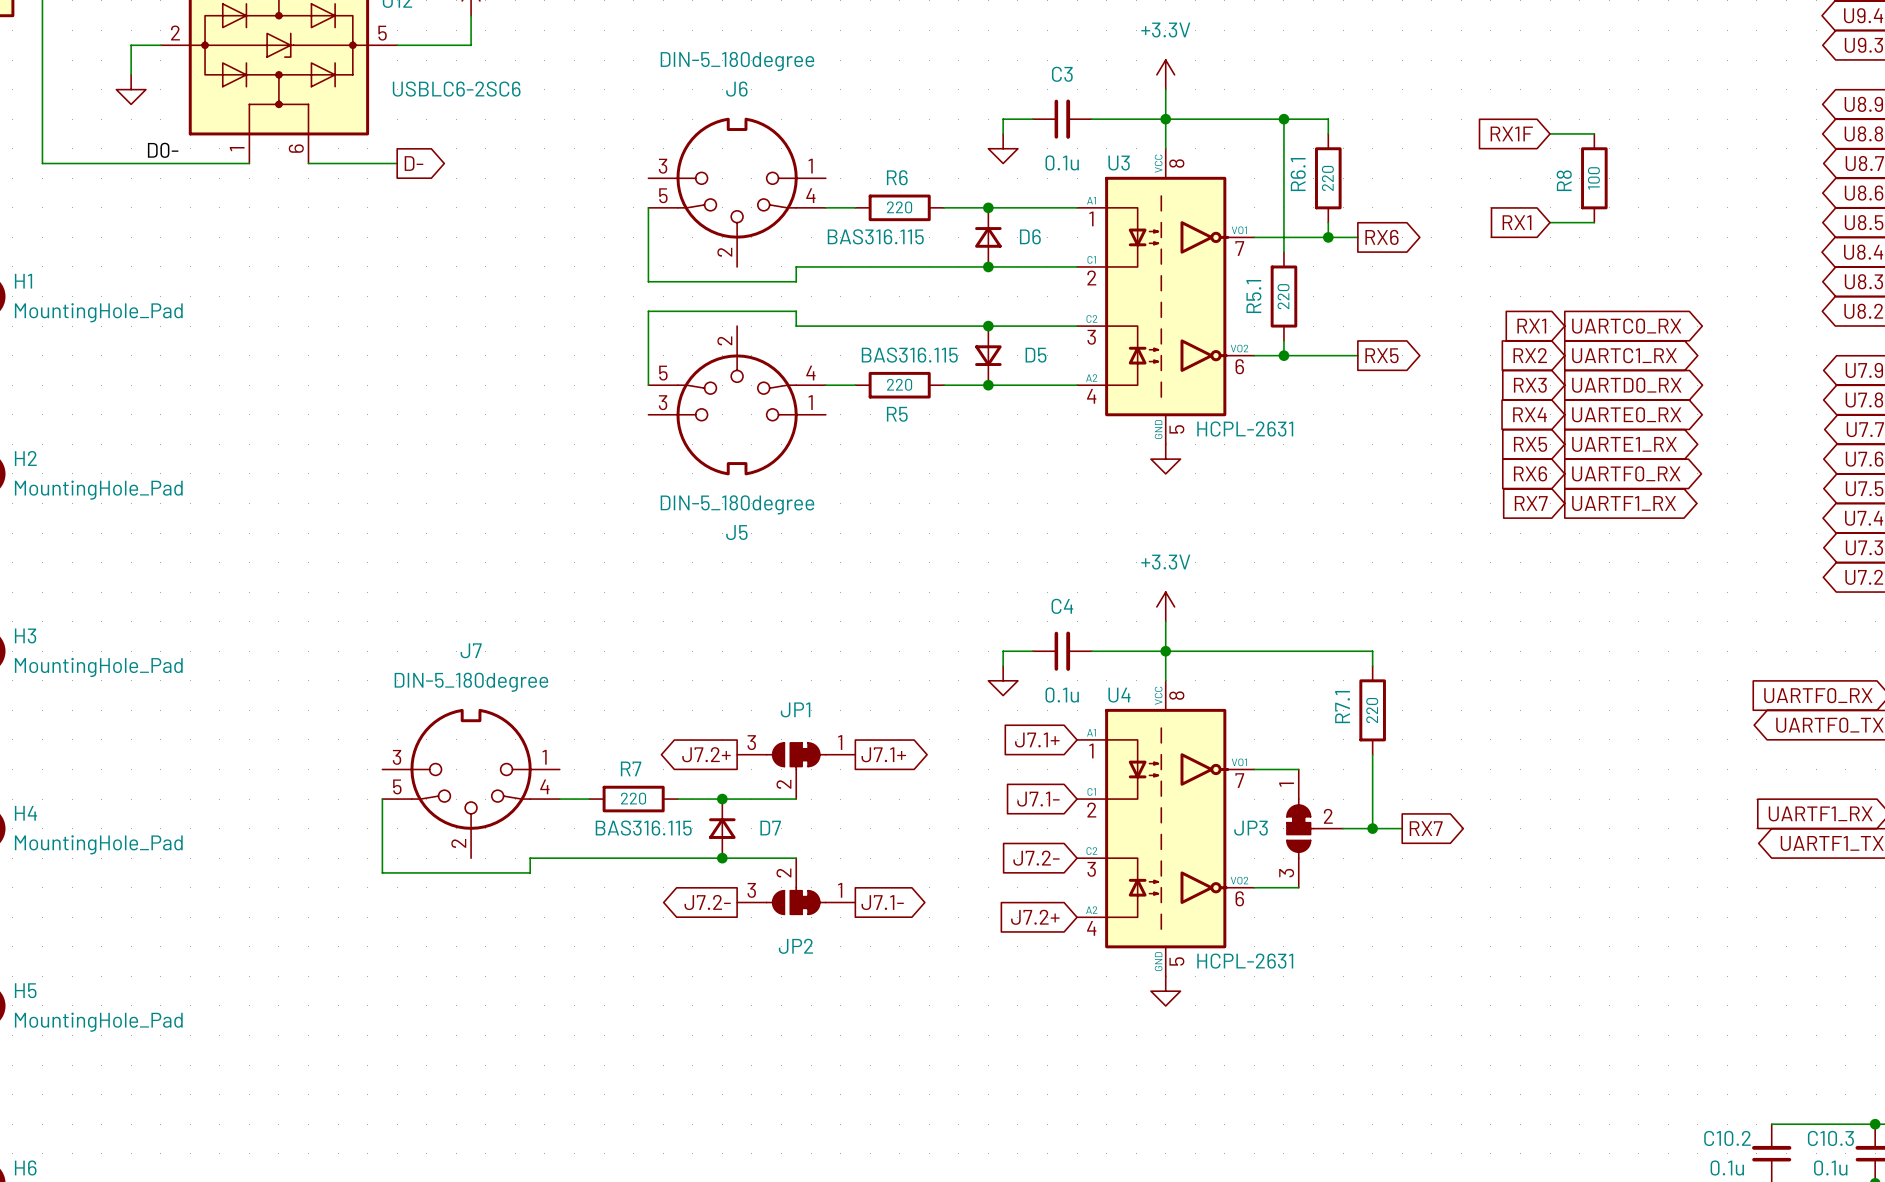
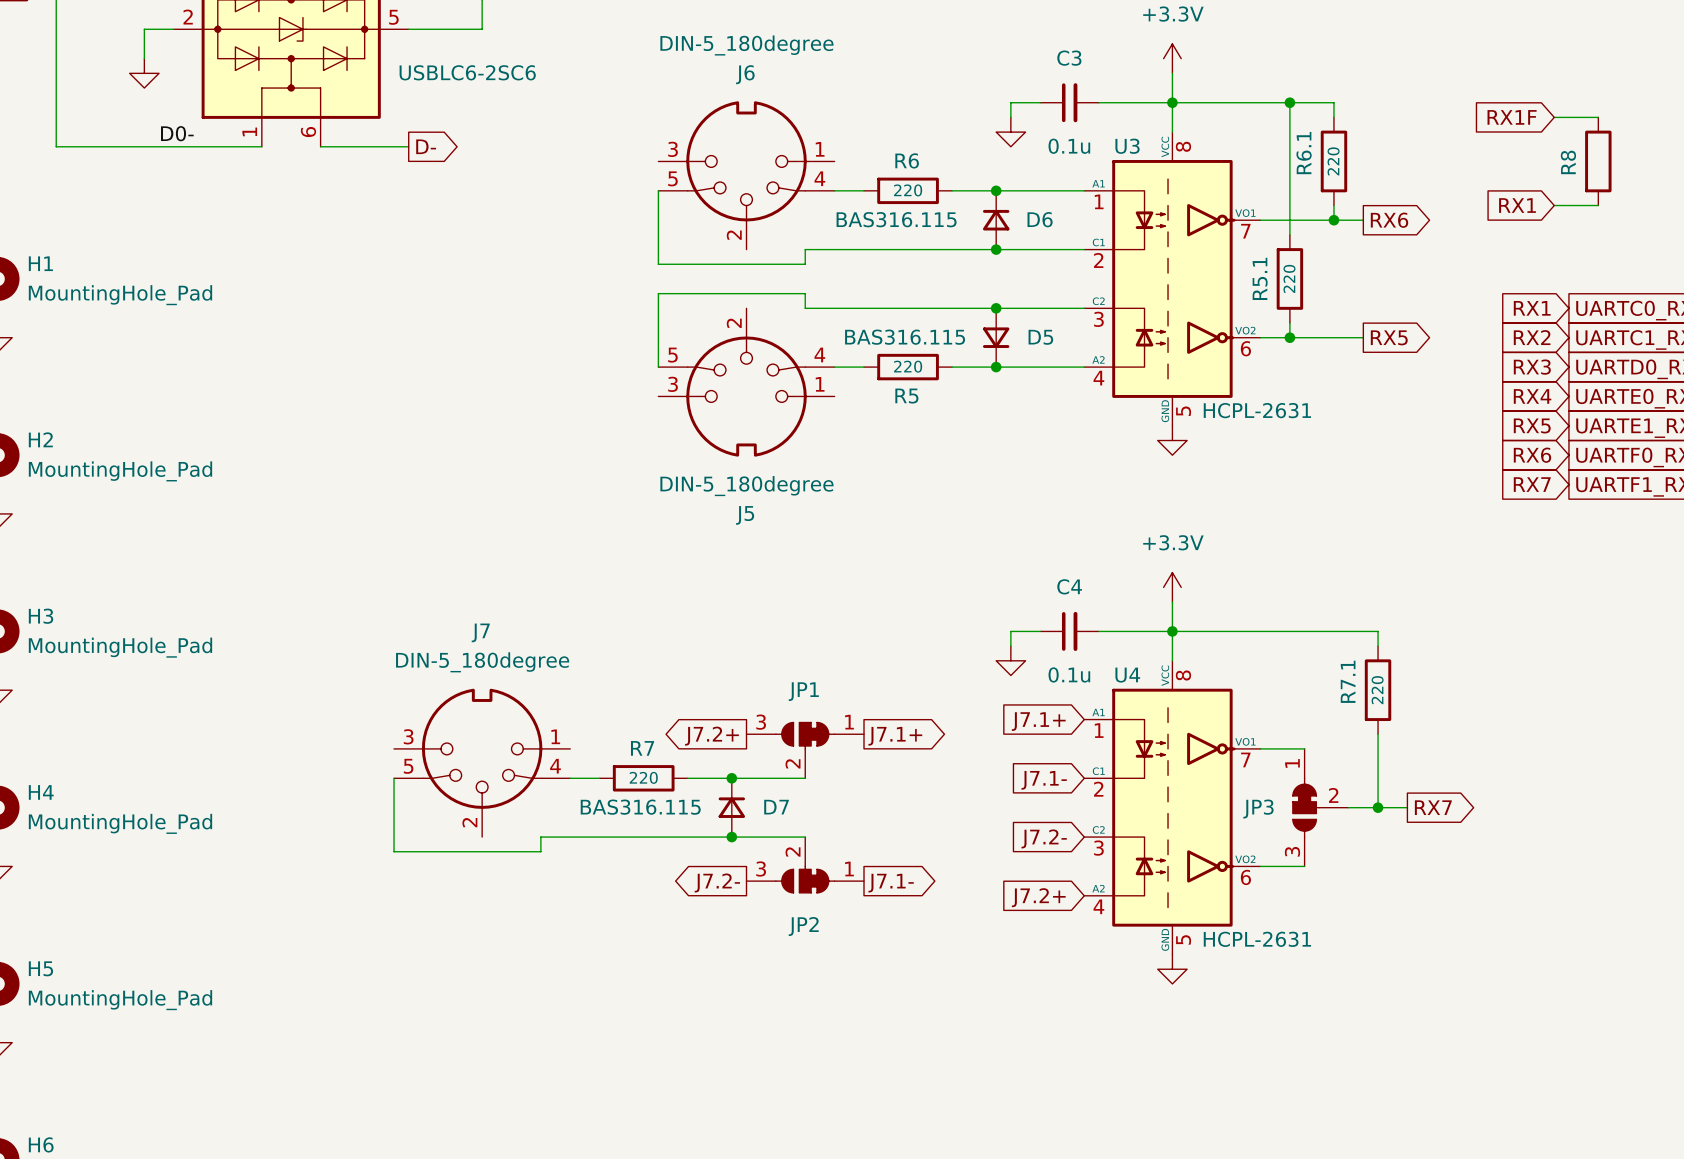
R8 value: 100 (1593, 178) -> none

